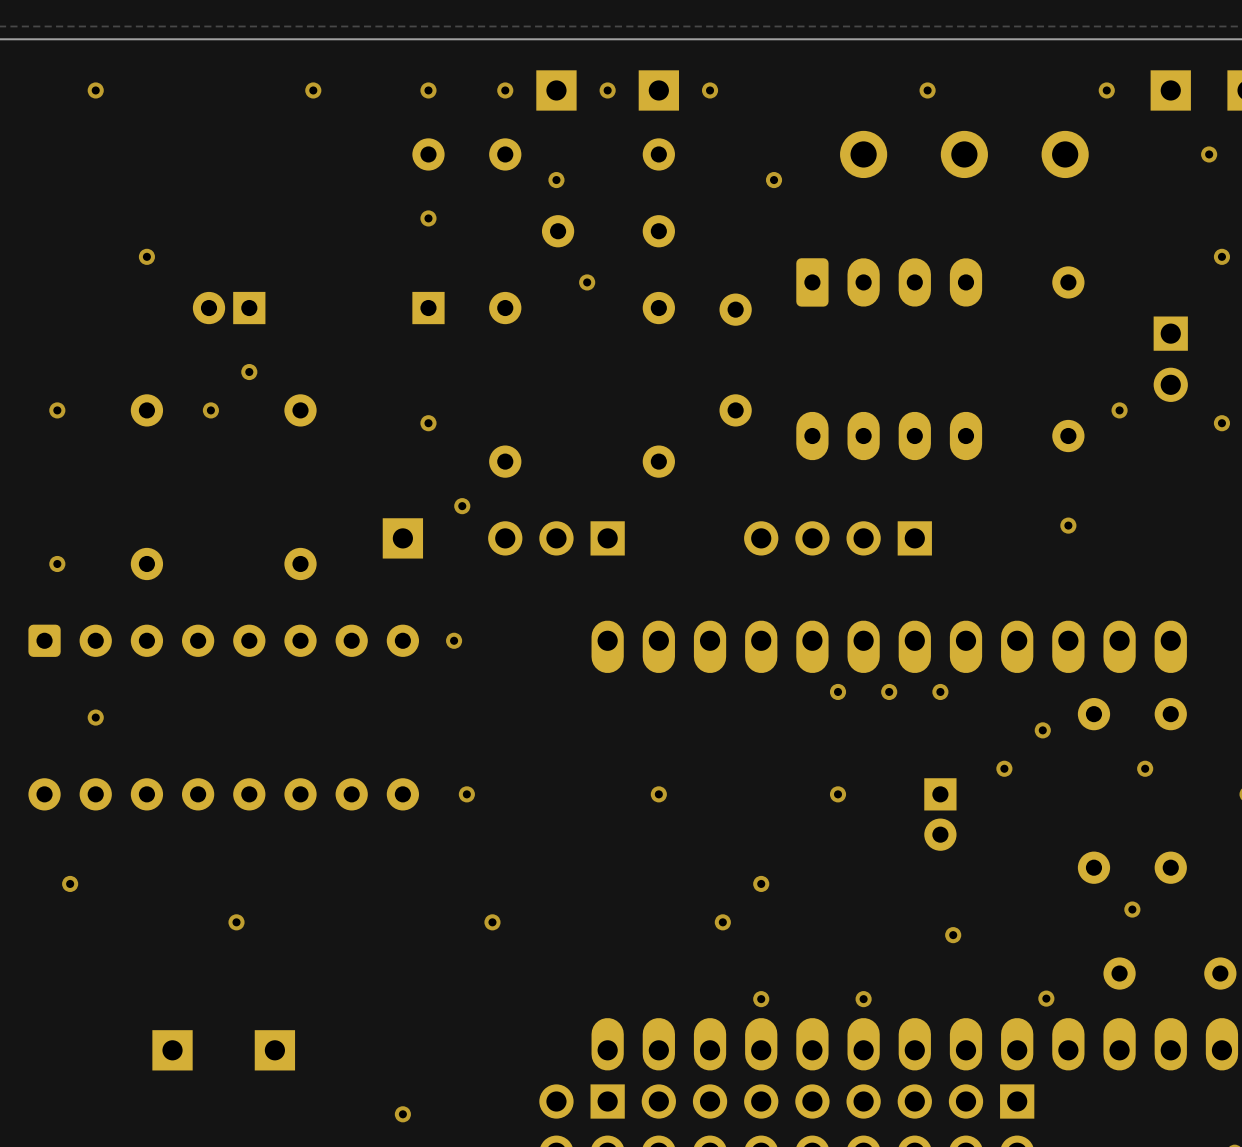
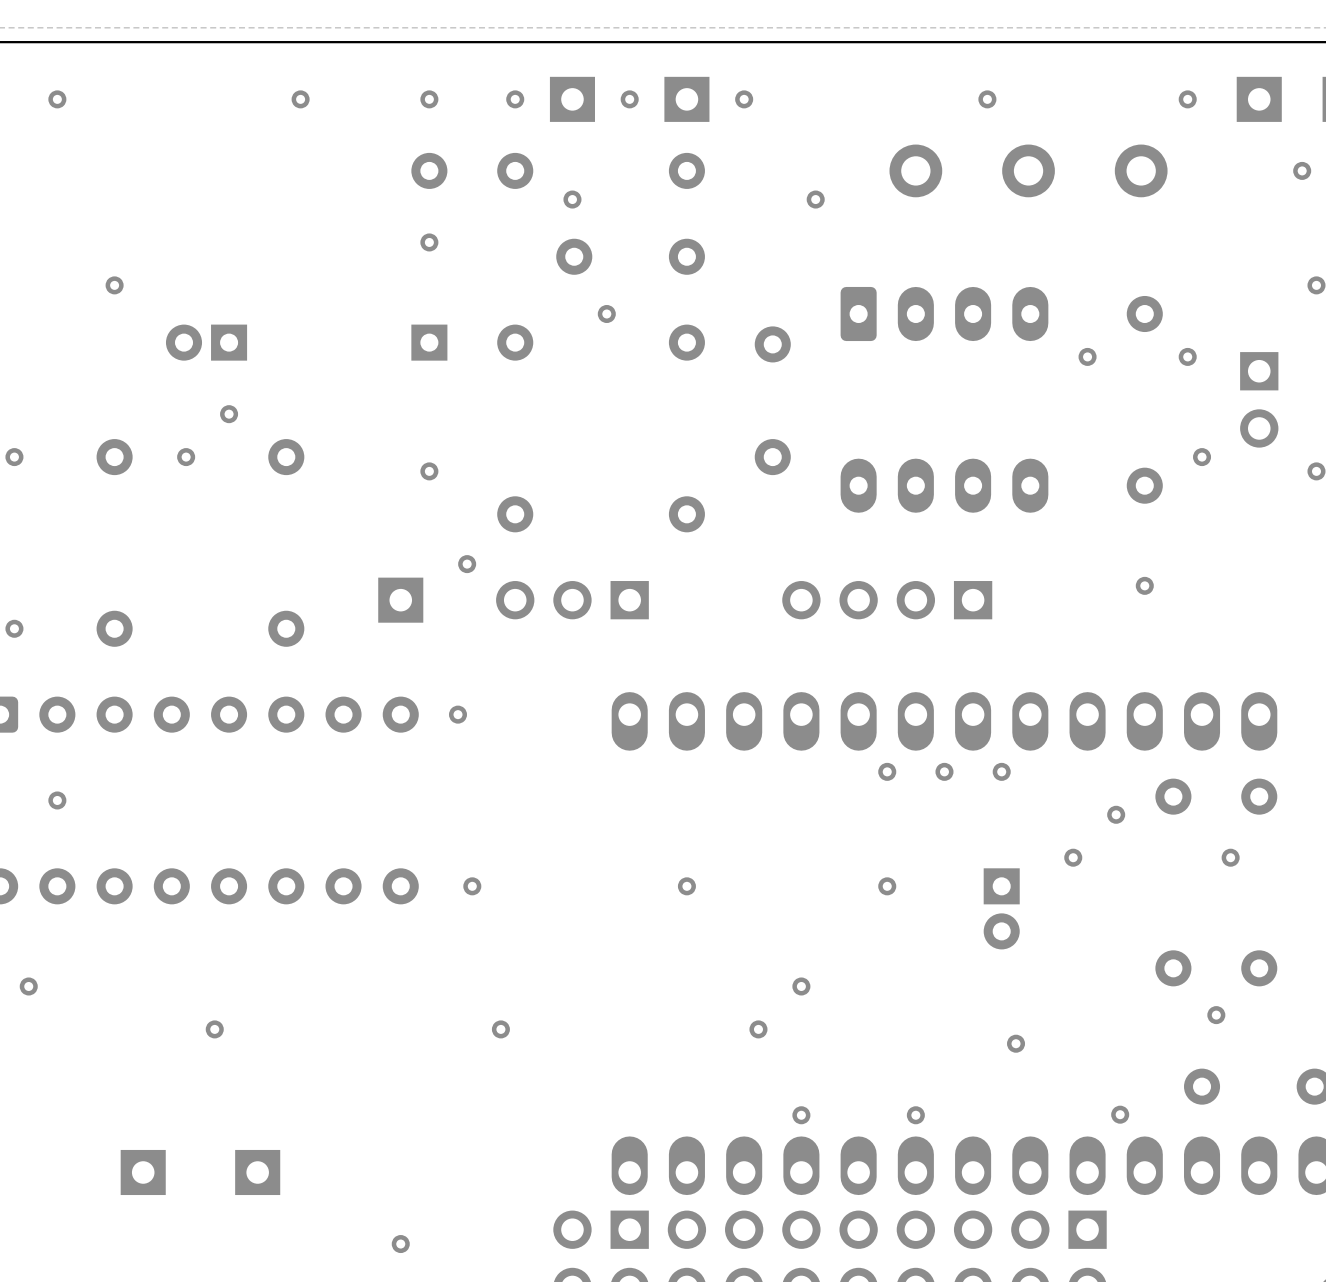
via: none -> (1087, 356)
via: none -> (1187, 356)

